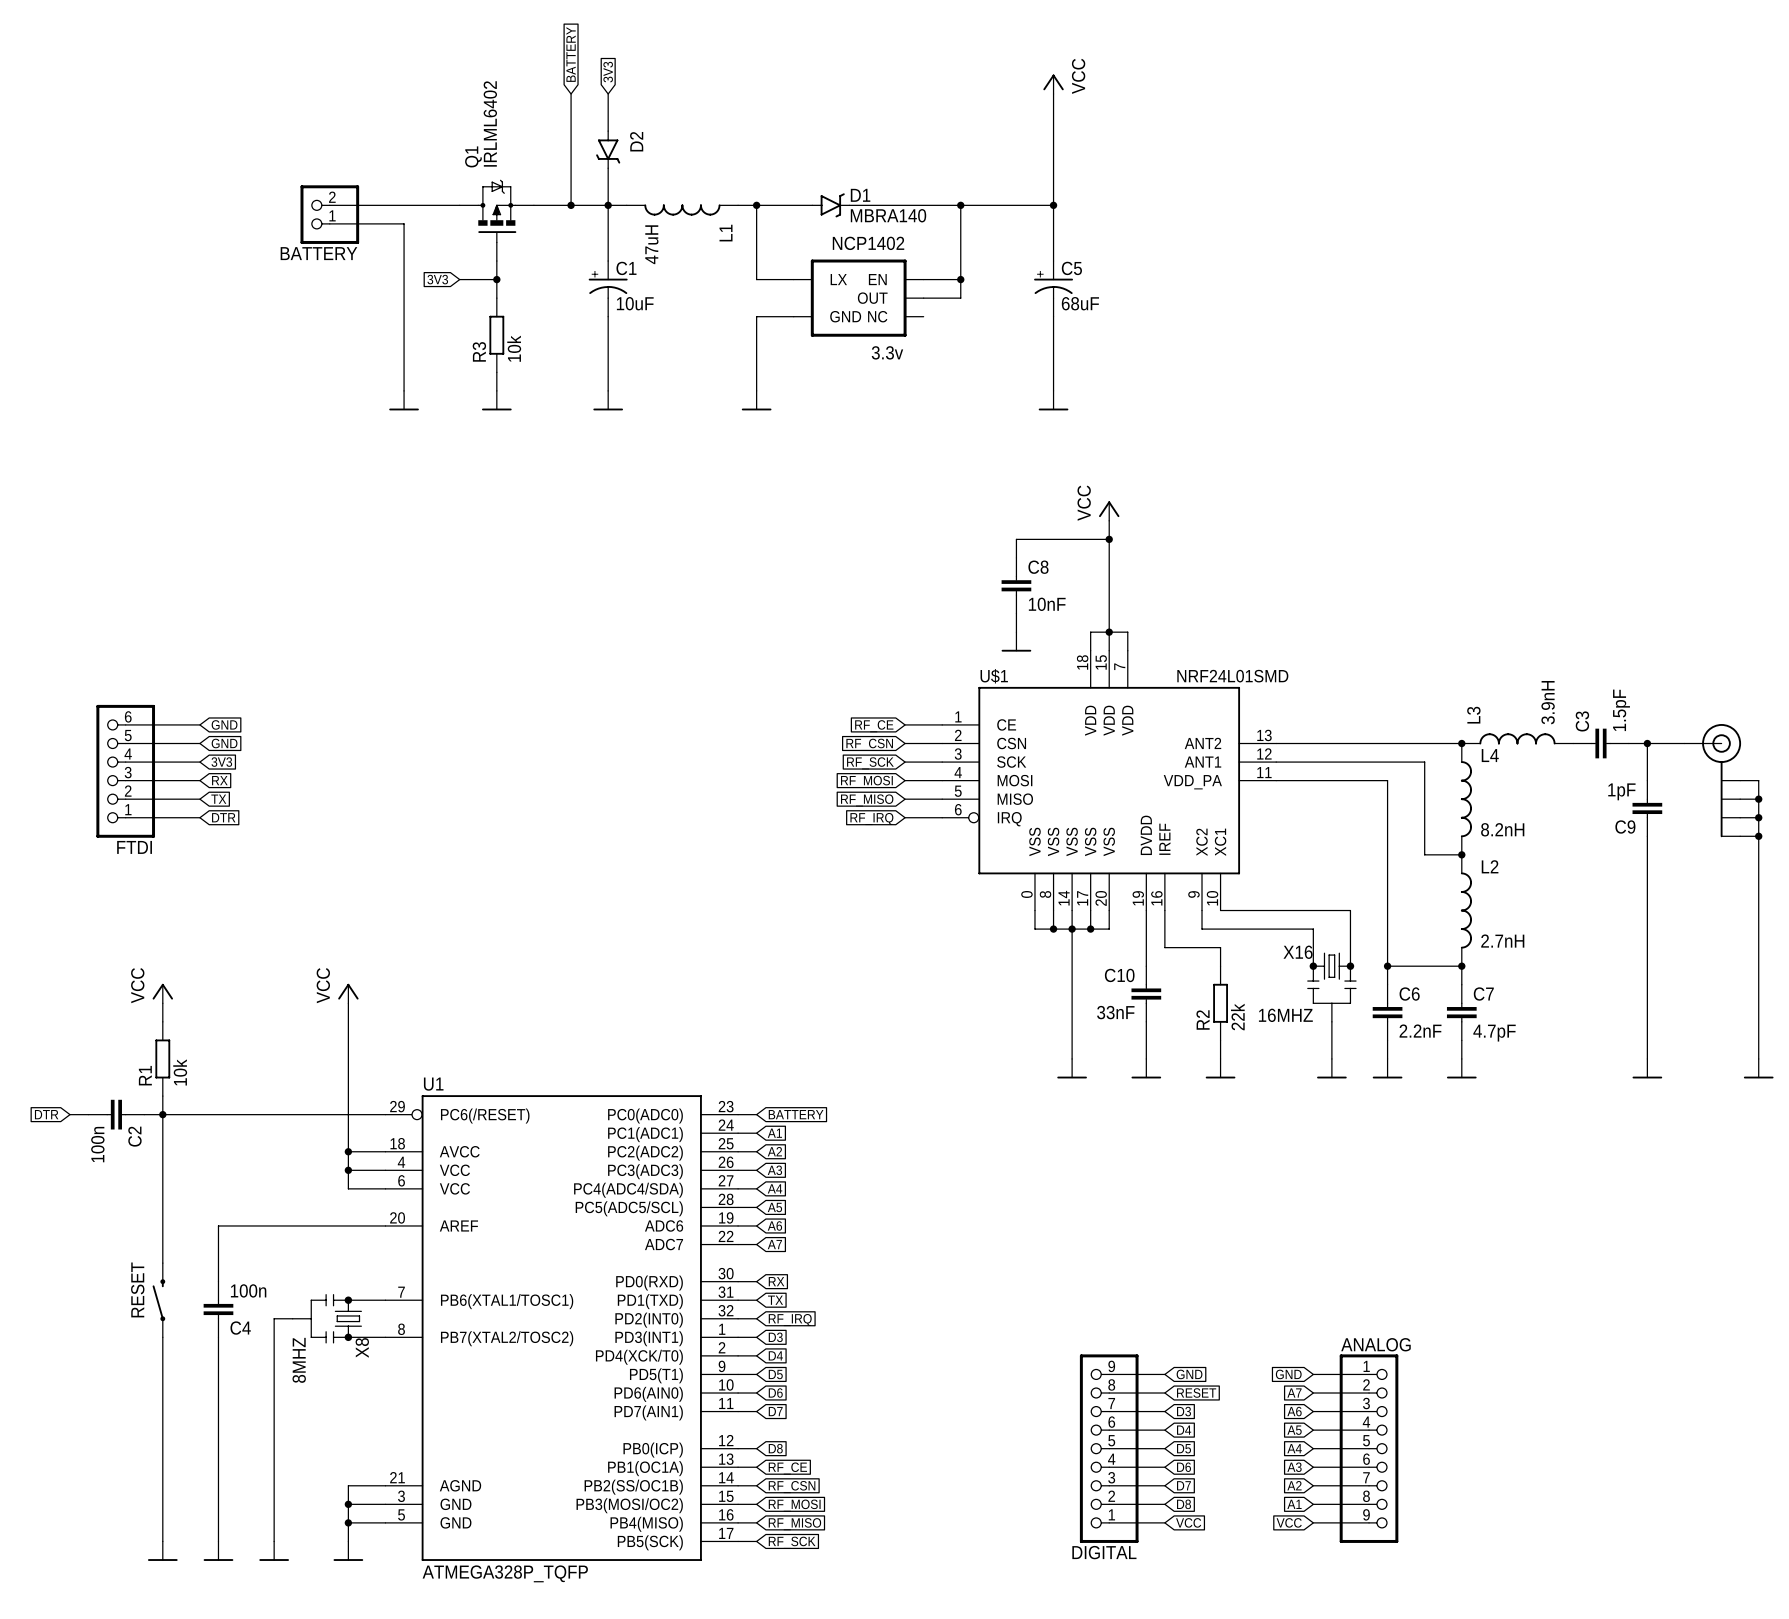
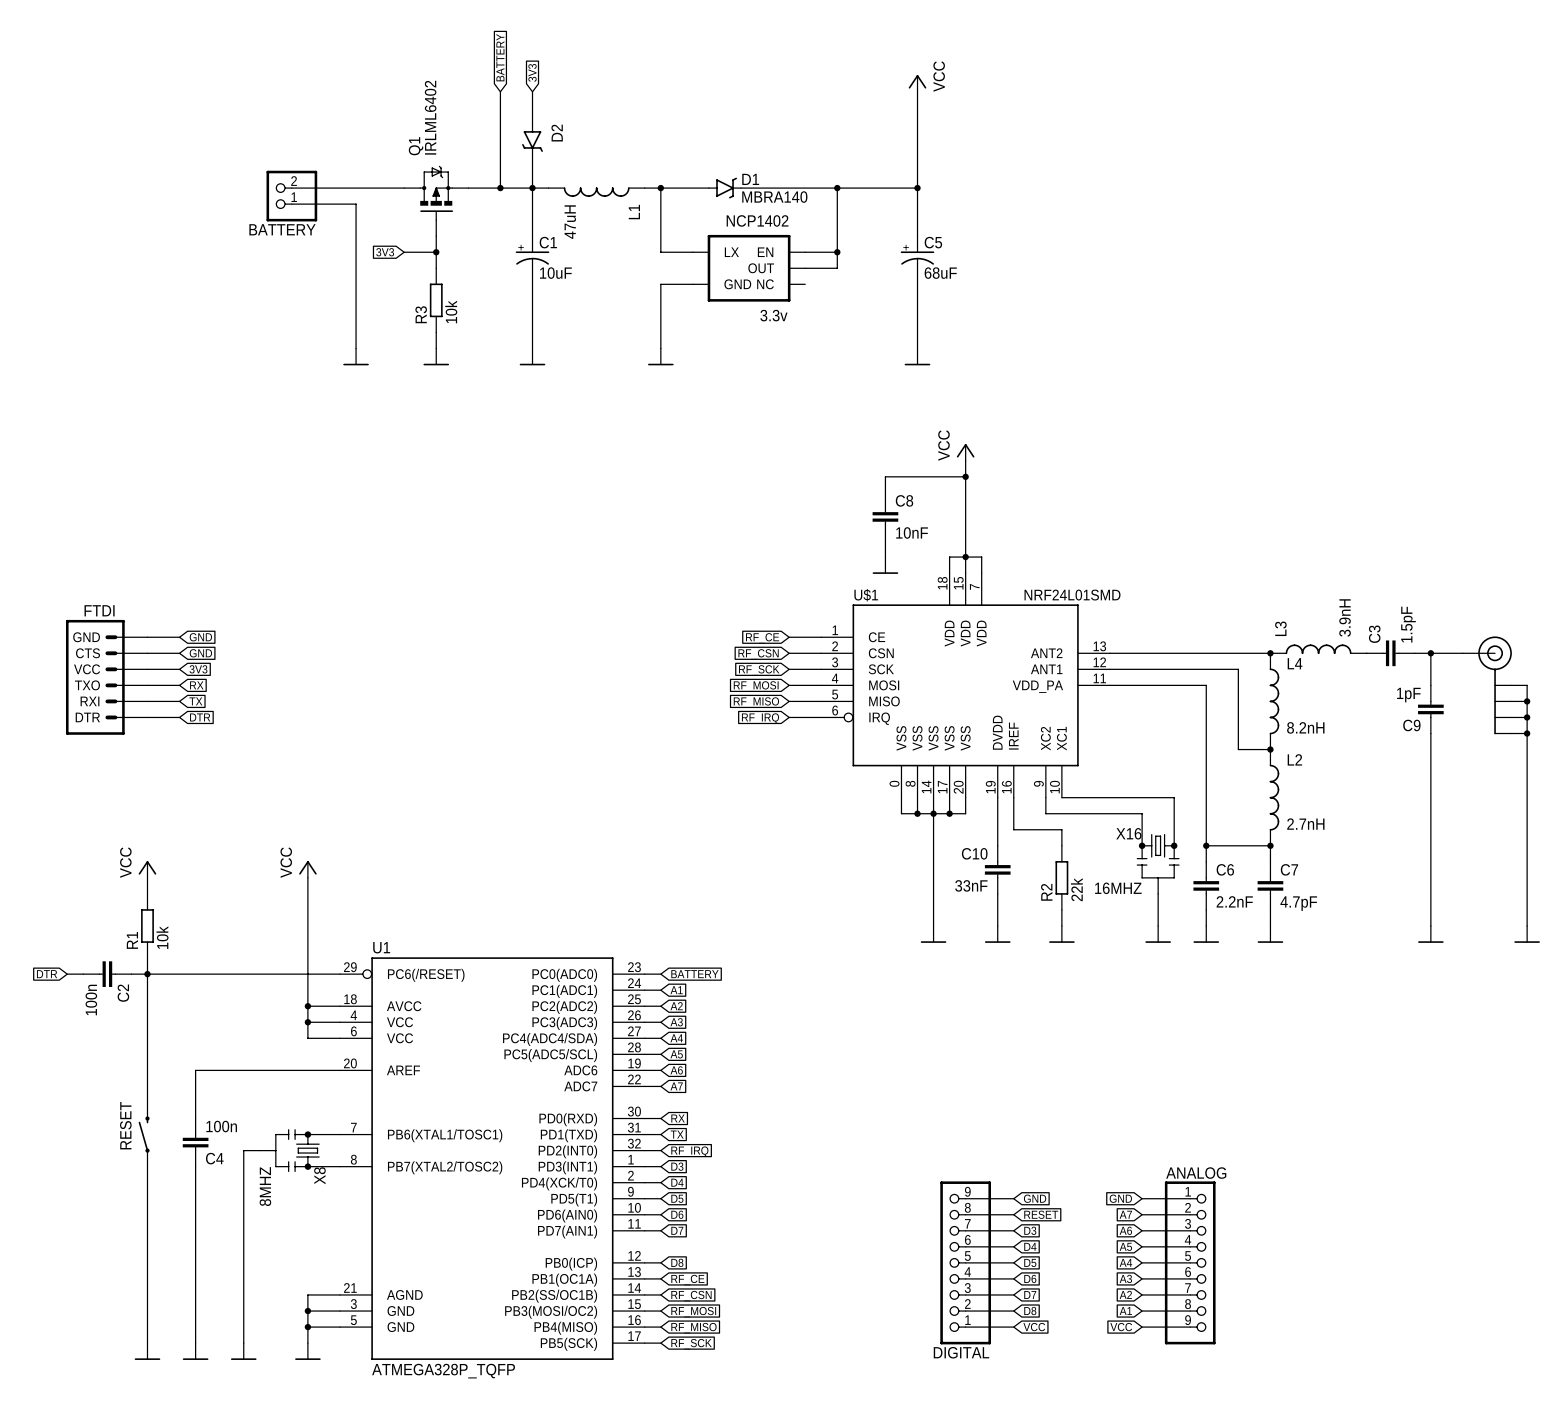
FTDI: none -> (106, 677)
FTDI: (125, 771) -> none

